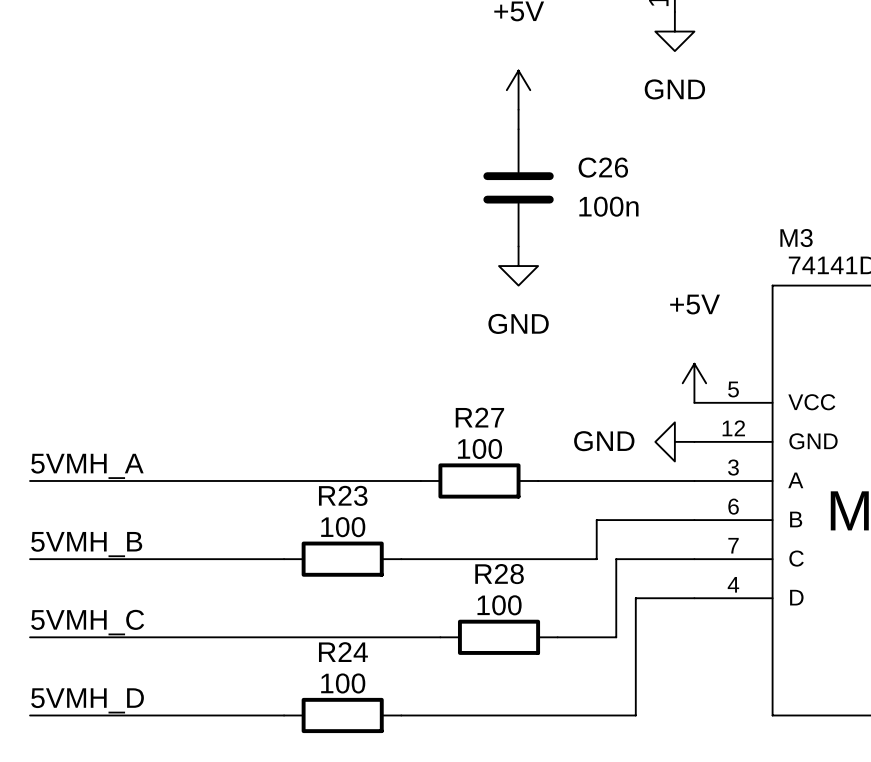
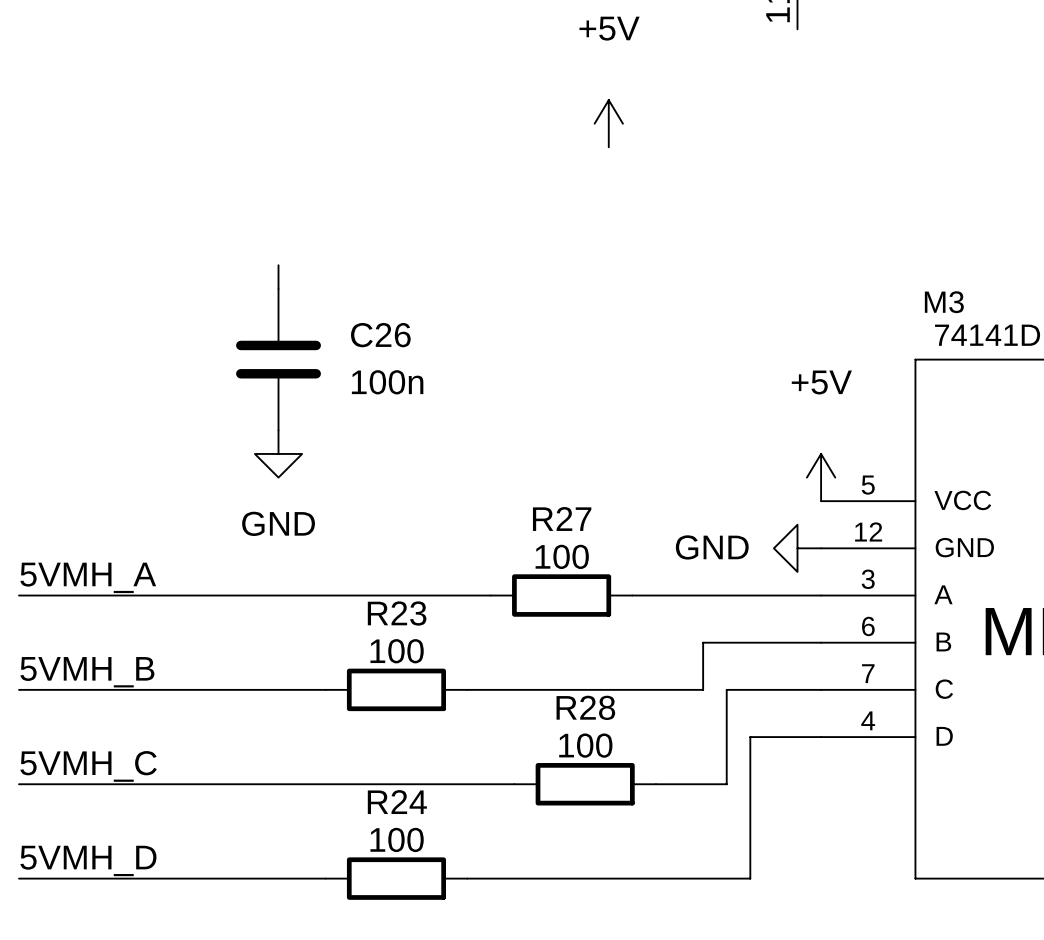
power symbol: GND (674, 31) -> none
wire: (518, 109) (518, 129) -> (278, 265) (278, 288)
C26 position: (518, 187) -> (278, 359)
power symbol: GND (518, 266) -> none
power symbol: none -> GND (278, 453)

